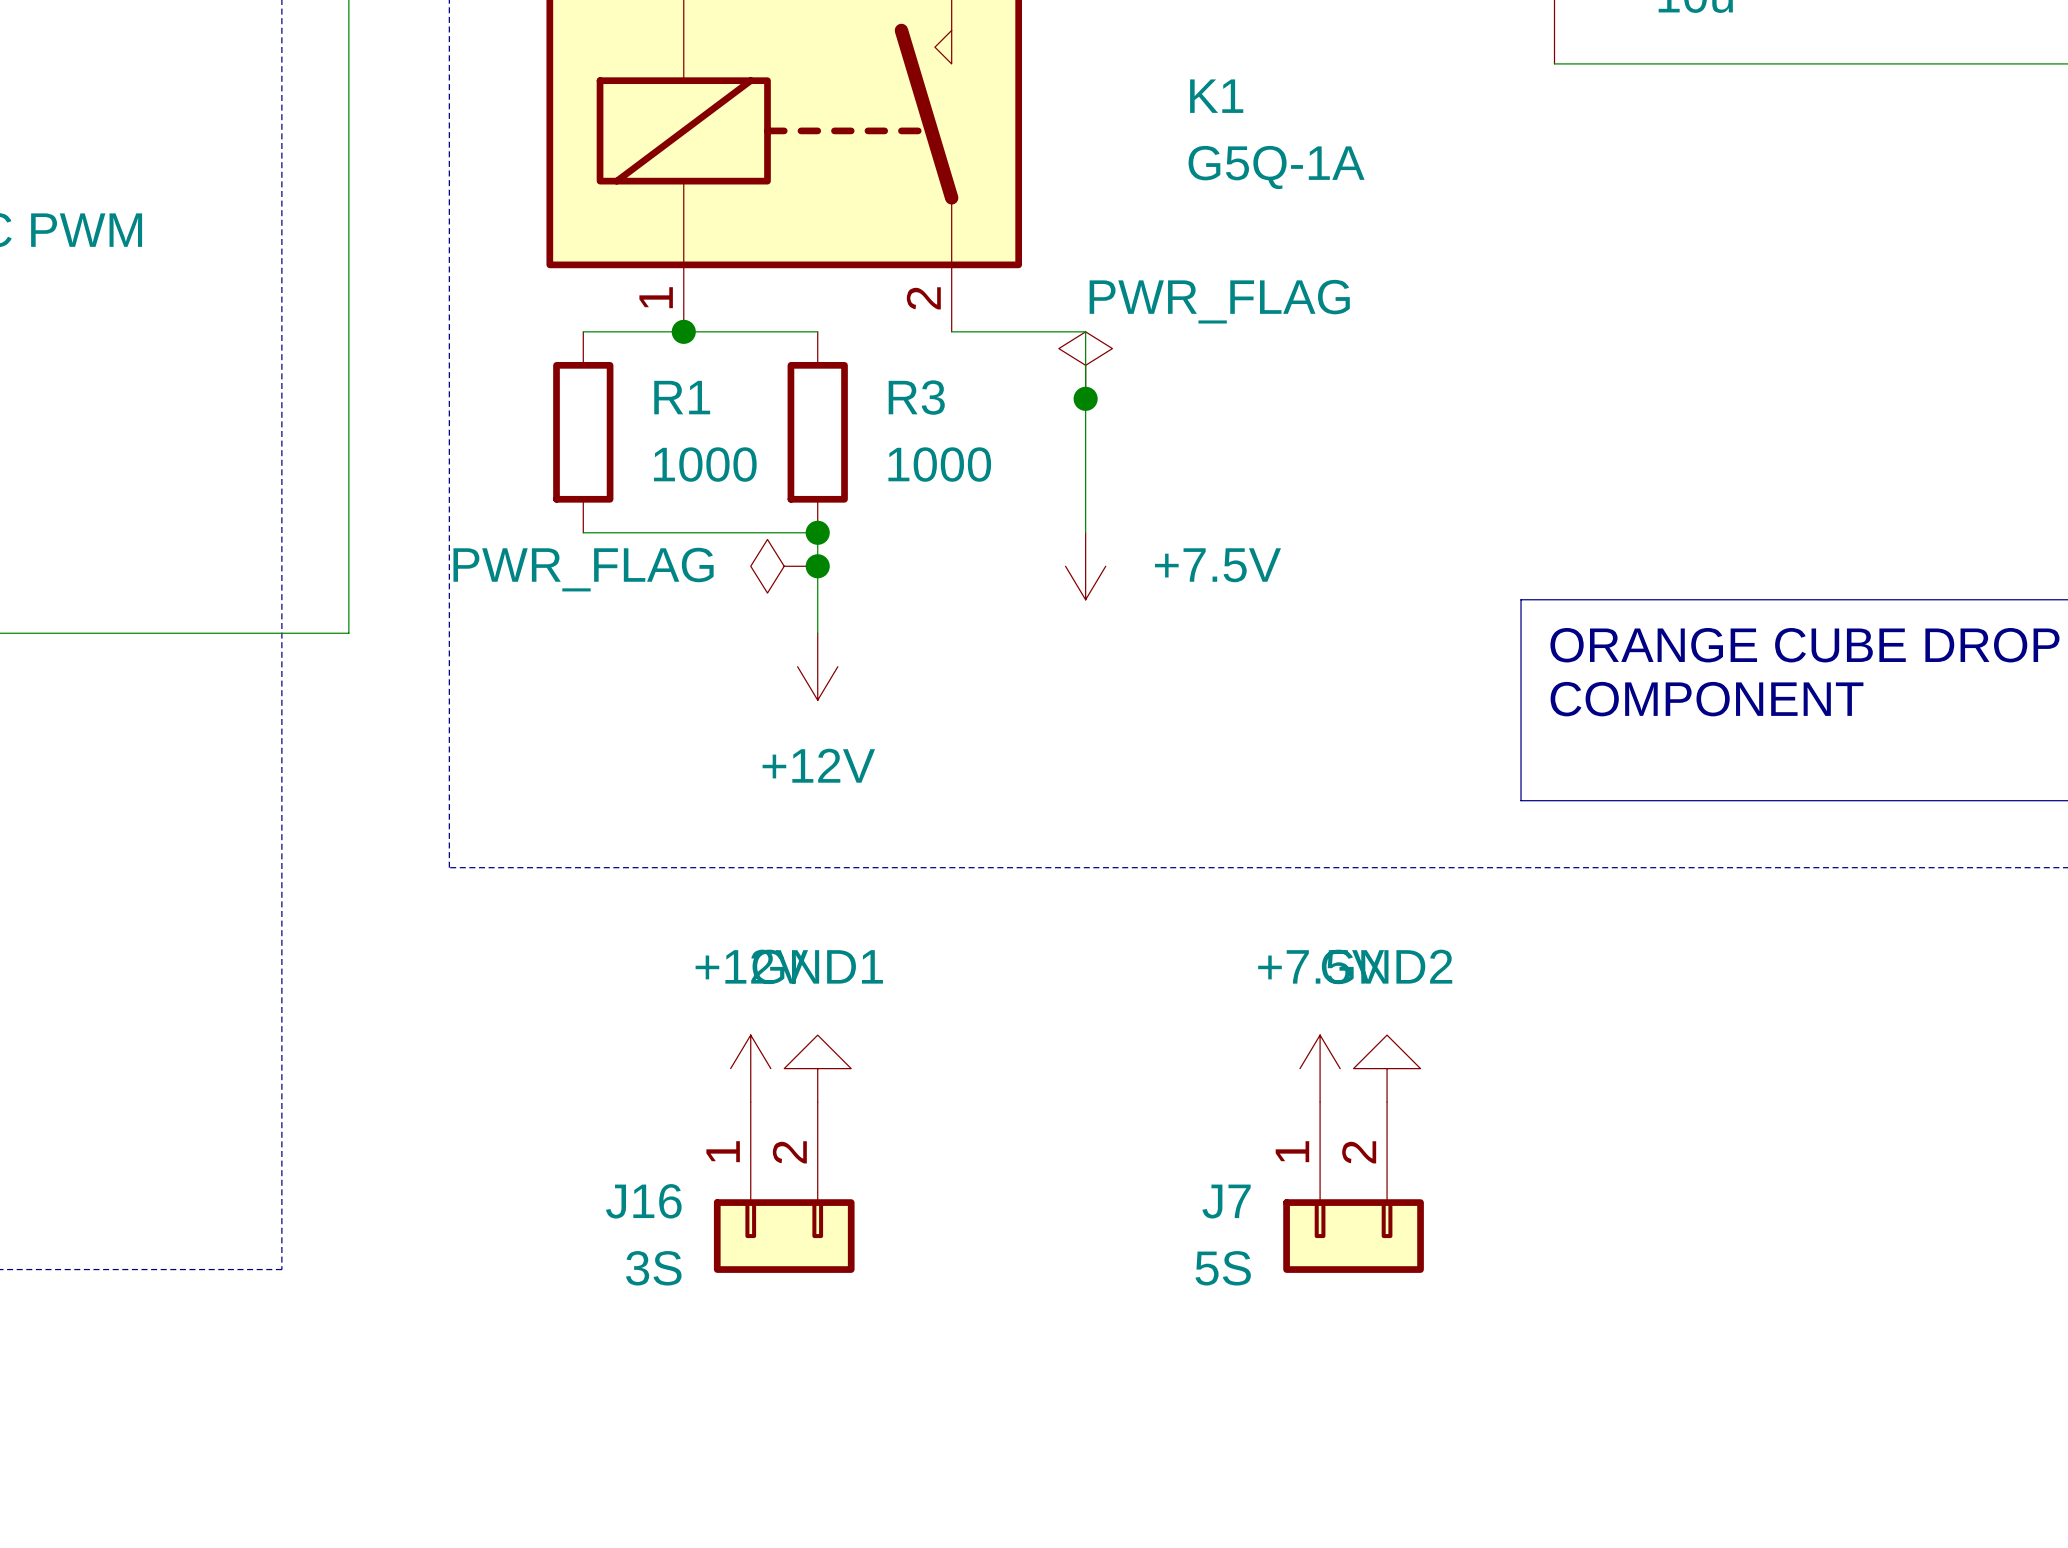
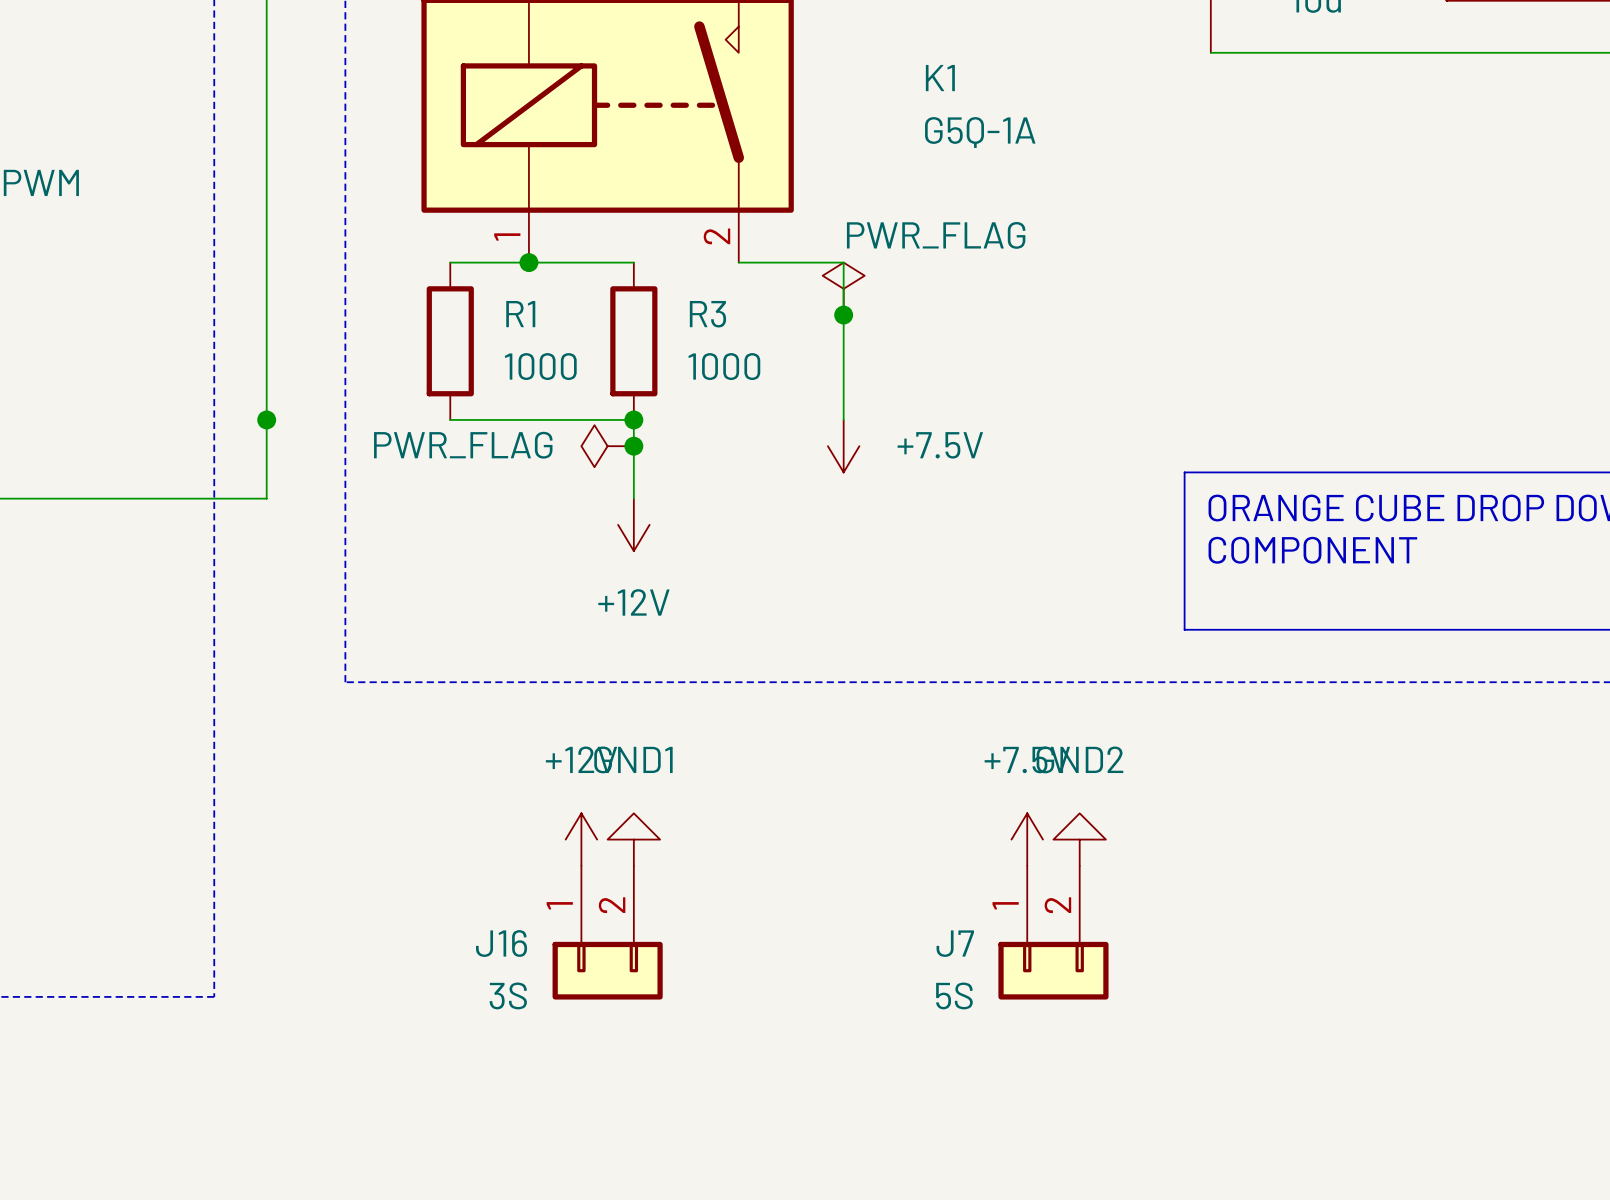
junction: none -> (266, 419)

